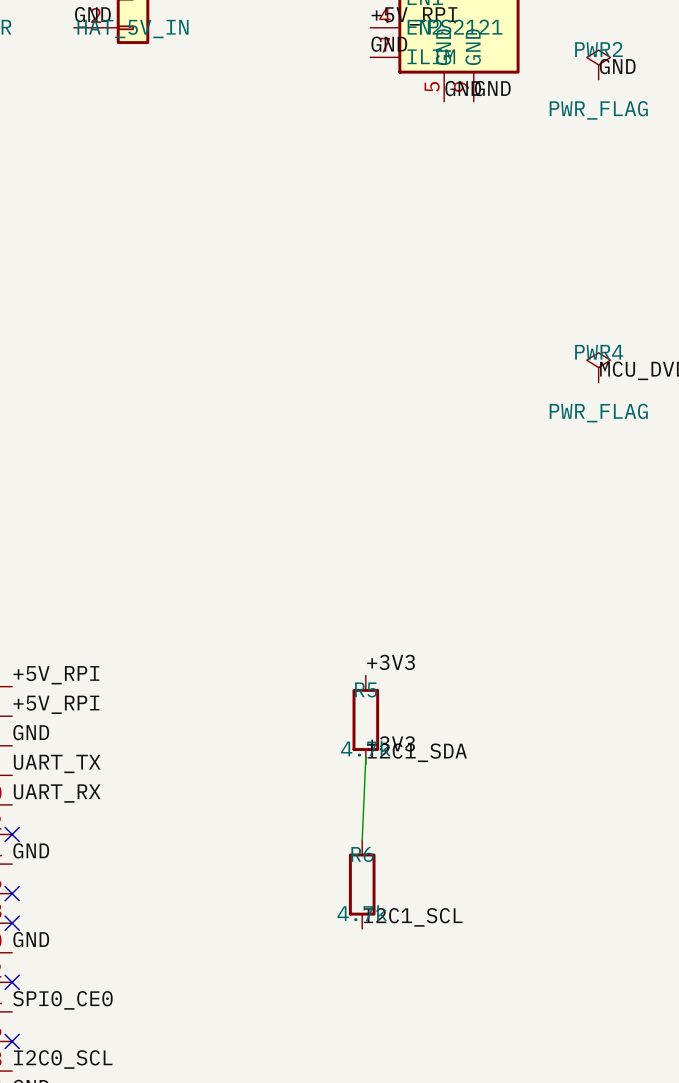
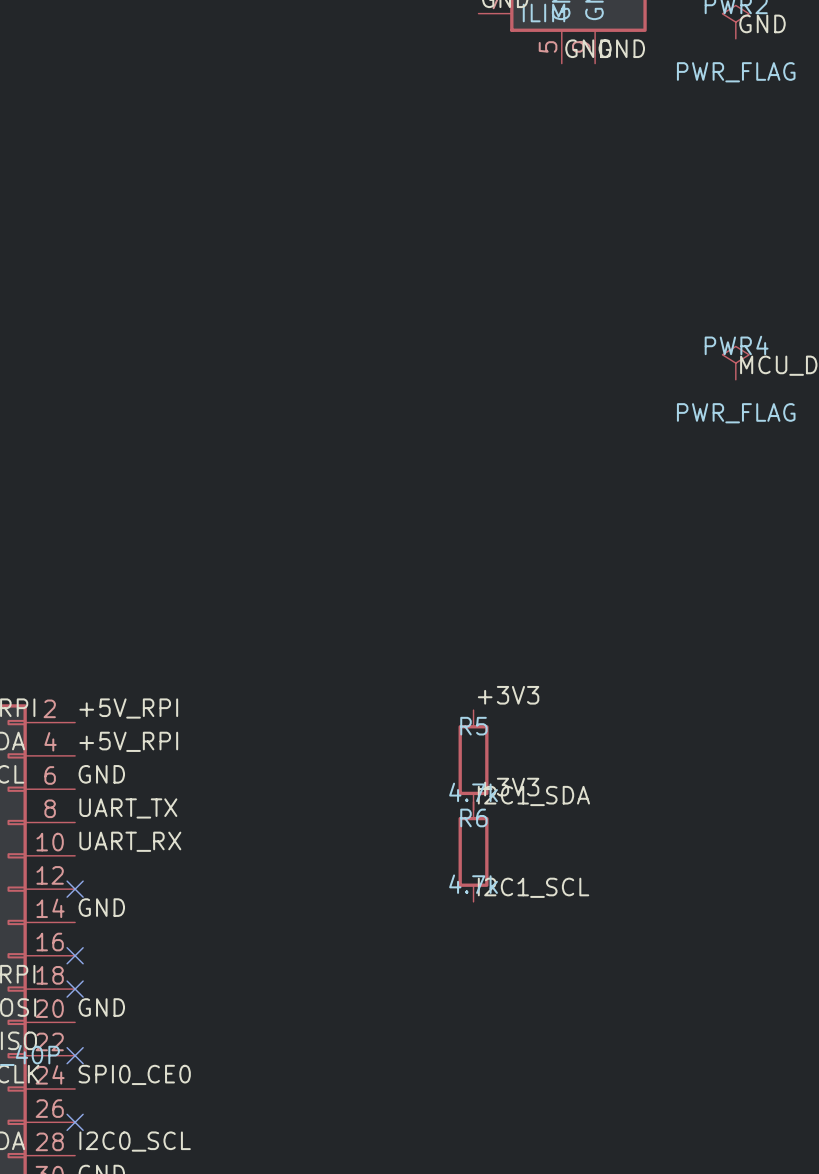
wire: (365, 757) (362, 840) -> none
R6 position: (362, 884) -> (473, 851)
label position: I2C1_SCL (413, 917) -> I2C1_SCL (533, 887)

